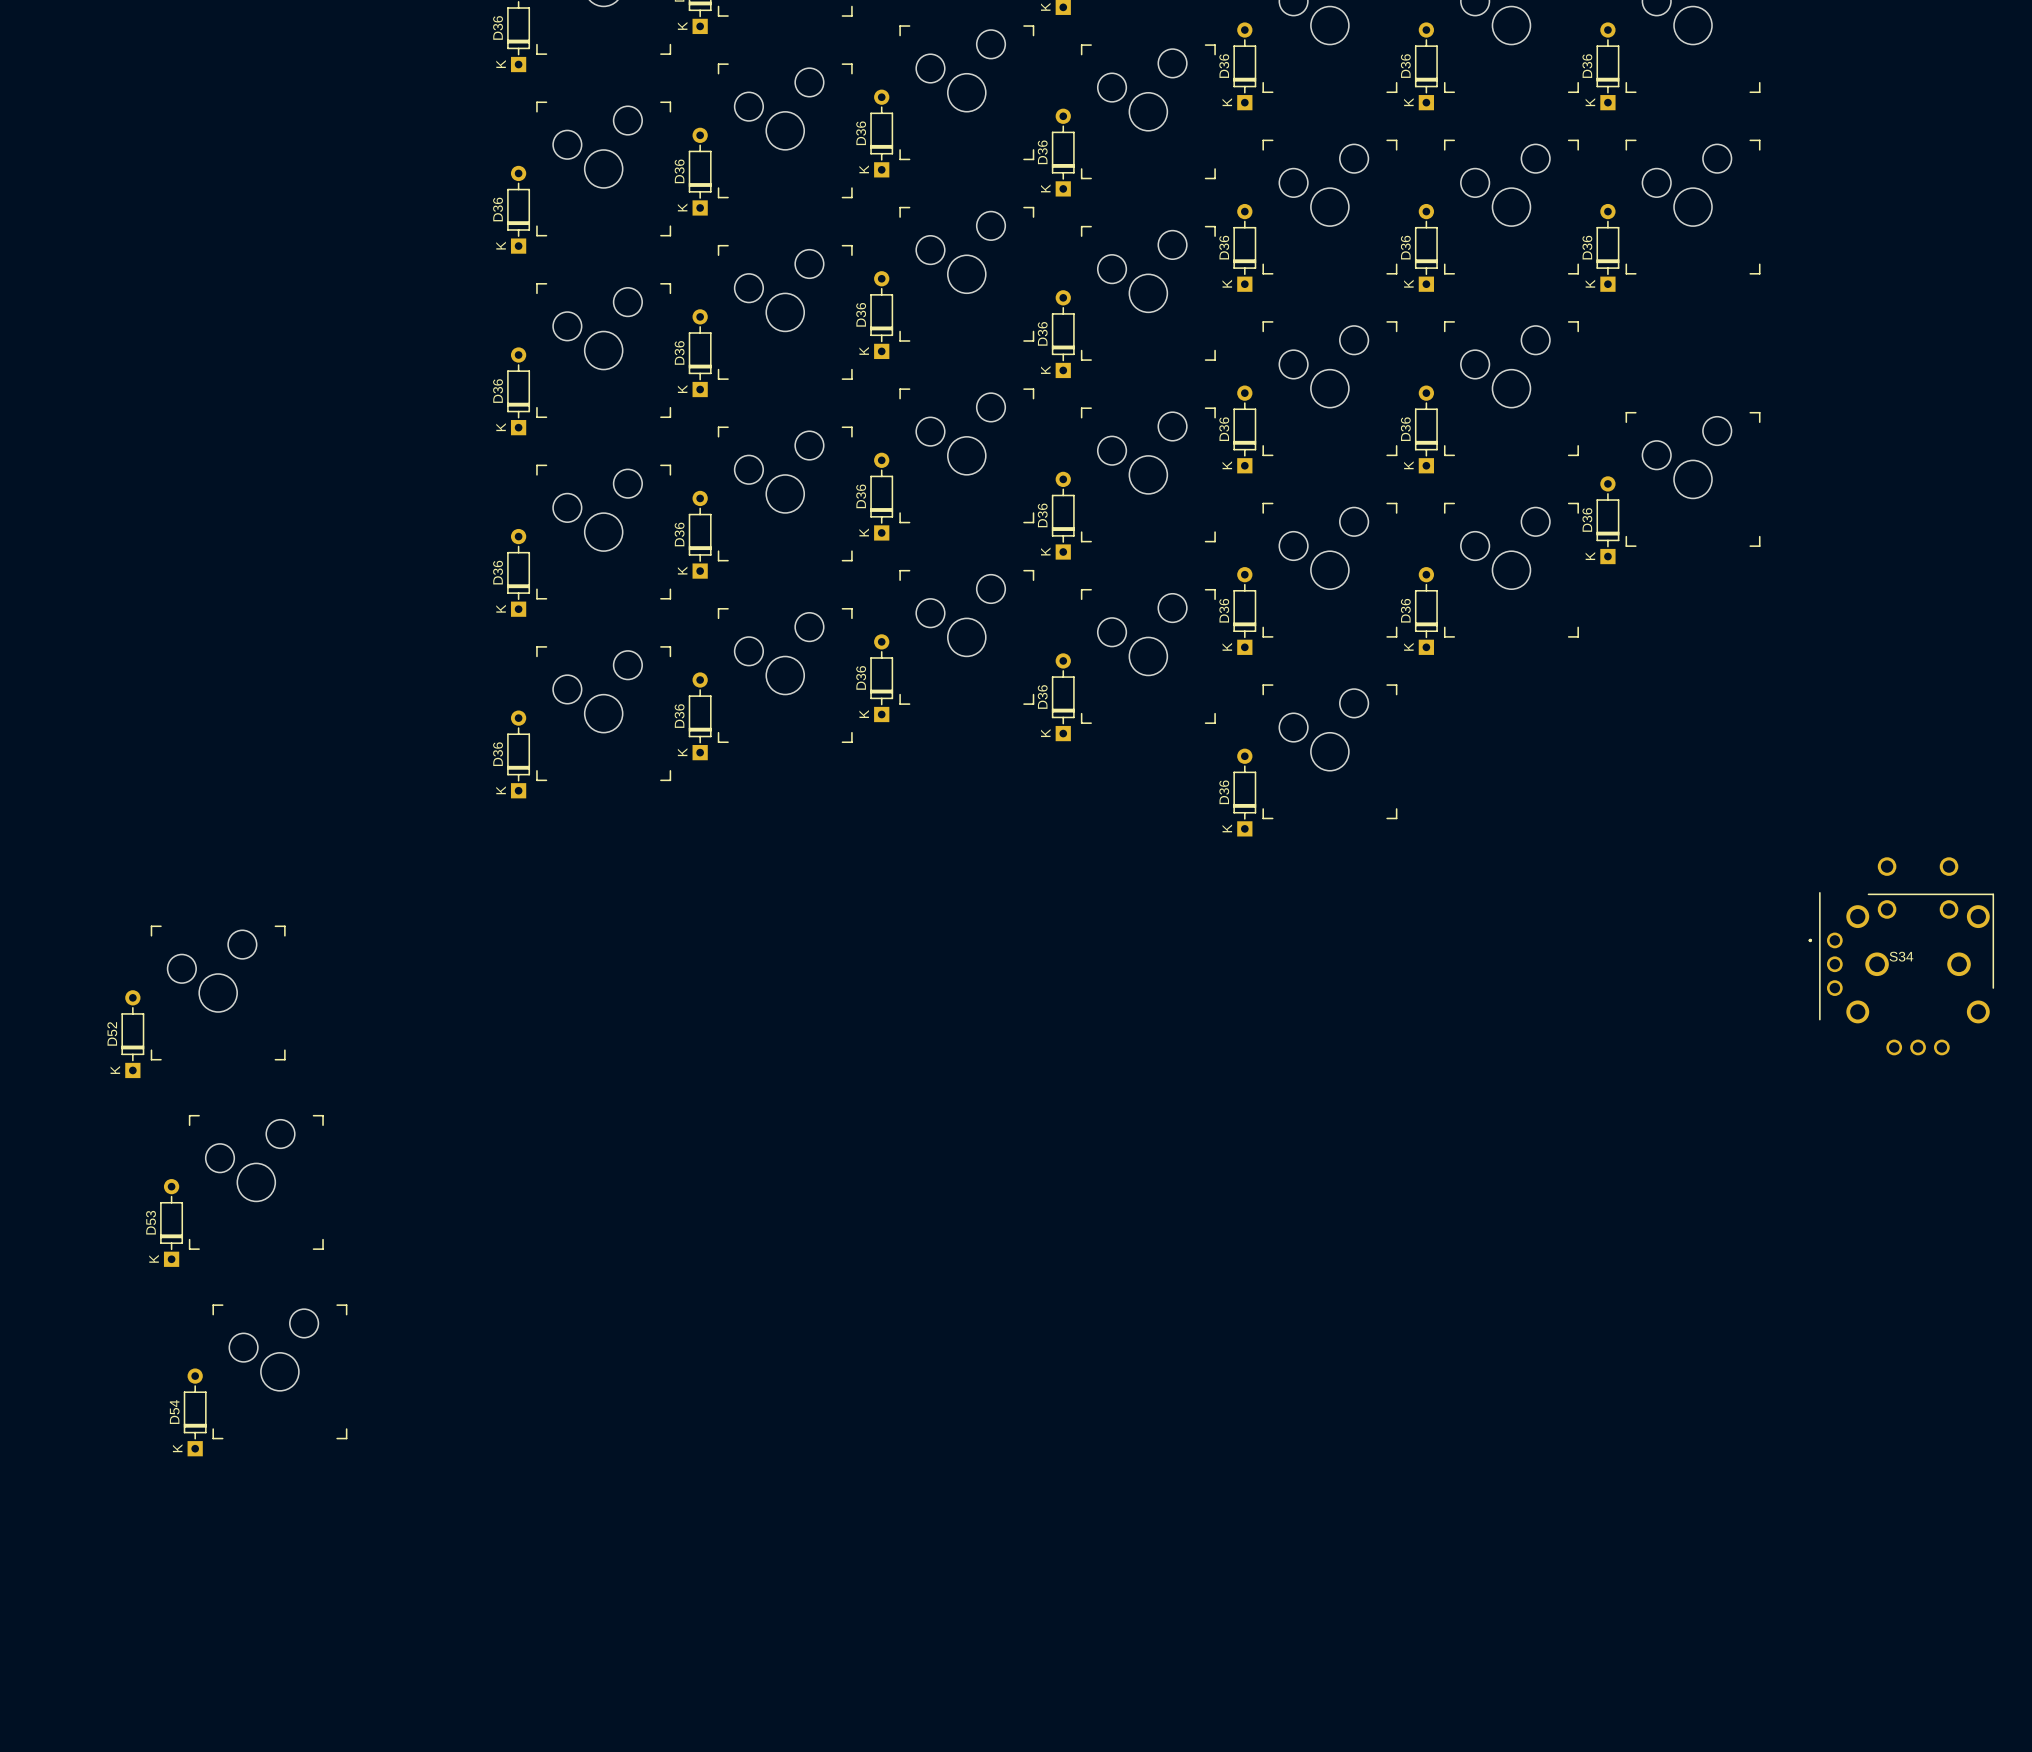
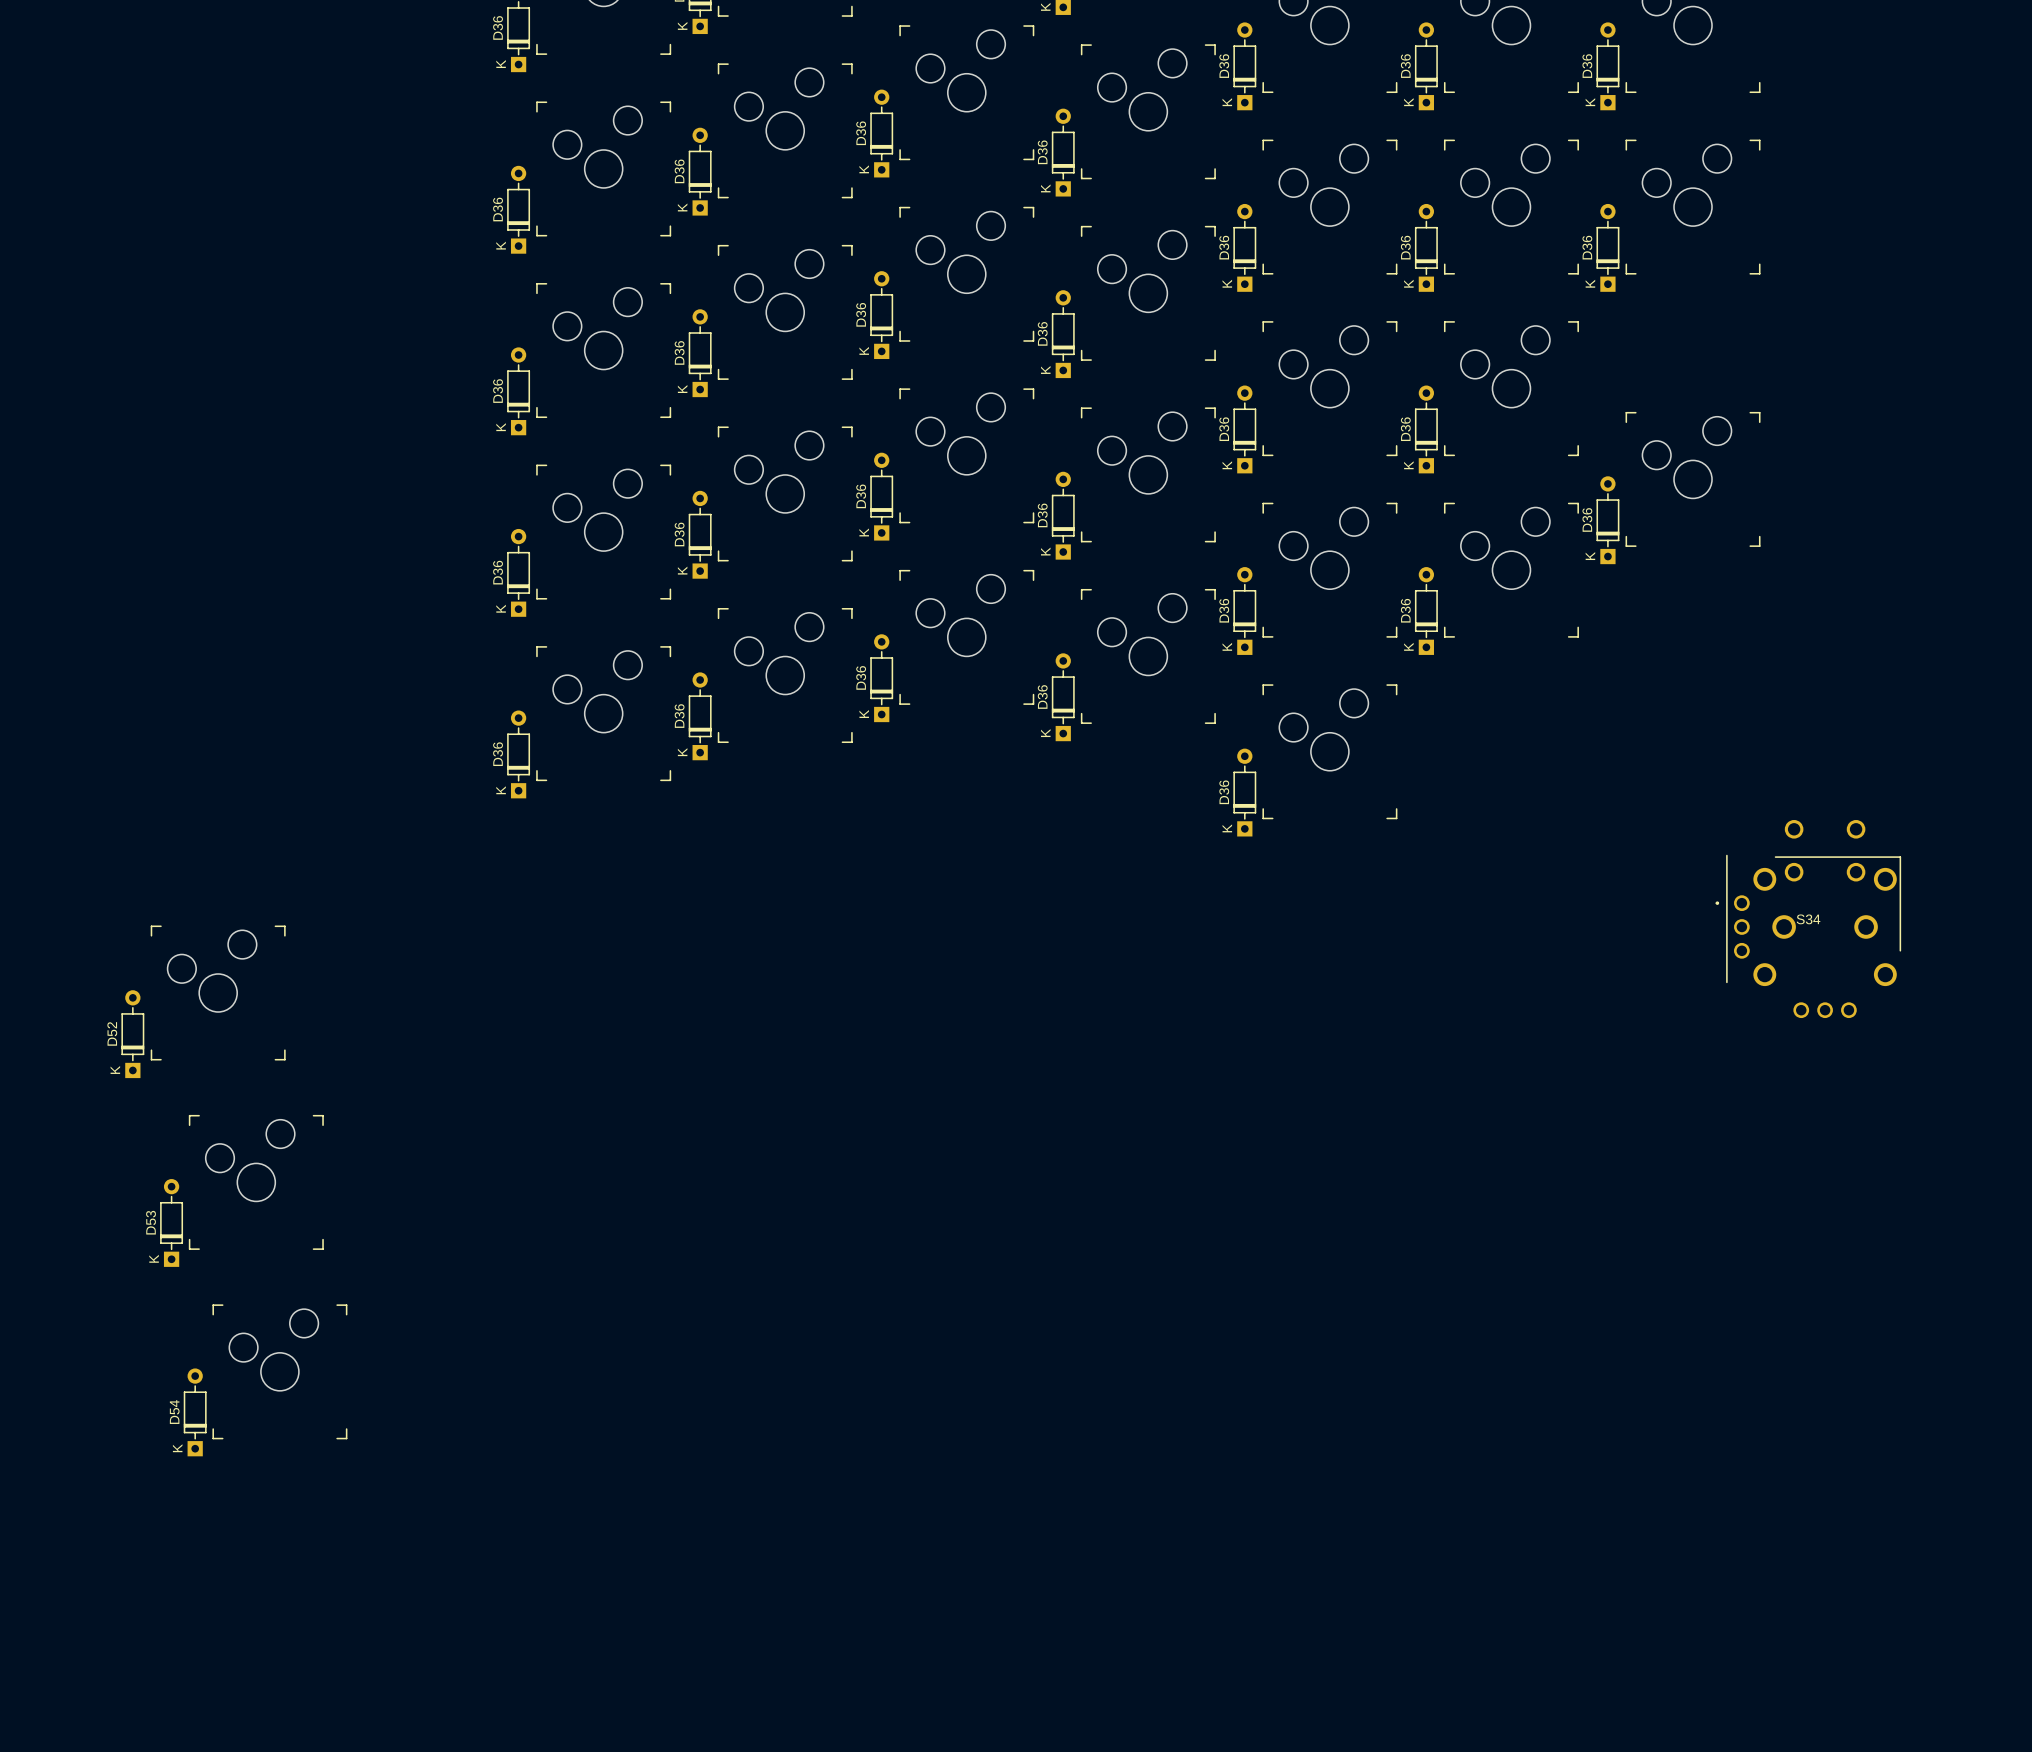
S34 position: (1901, 956) -> (1808, 919)

